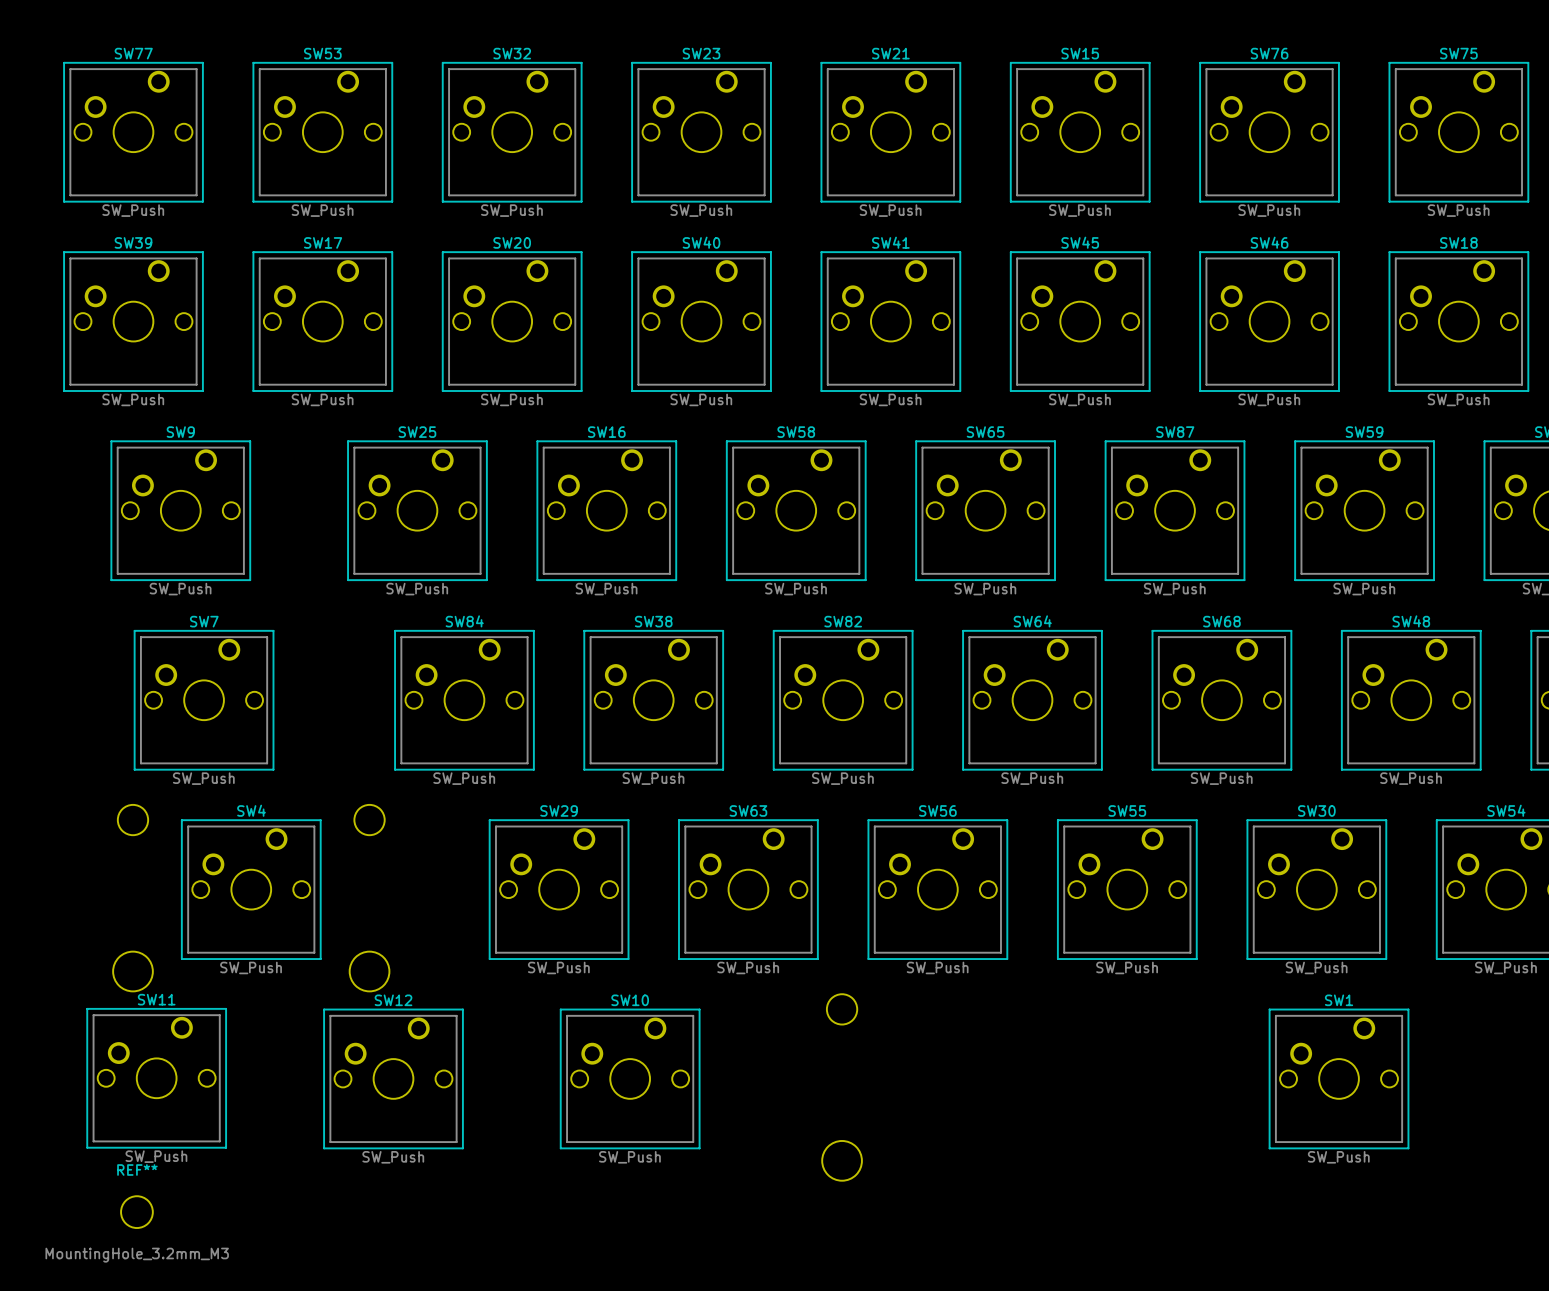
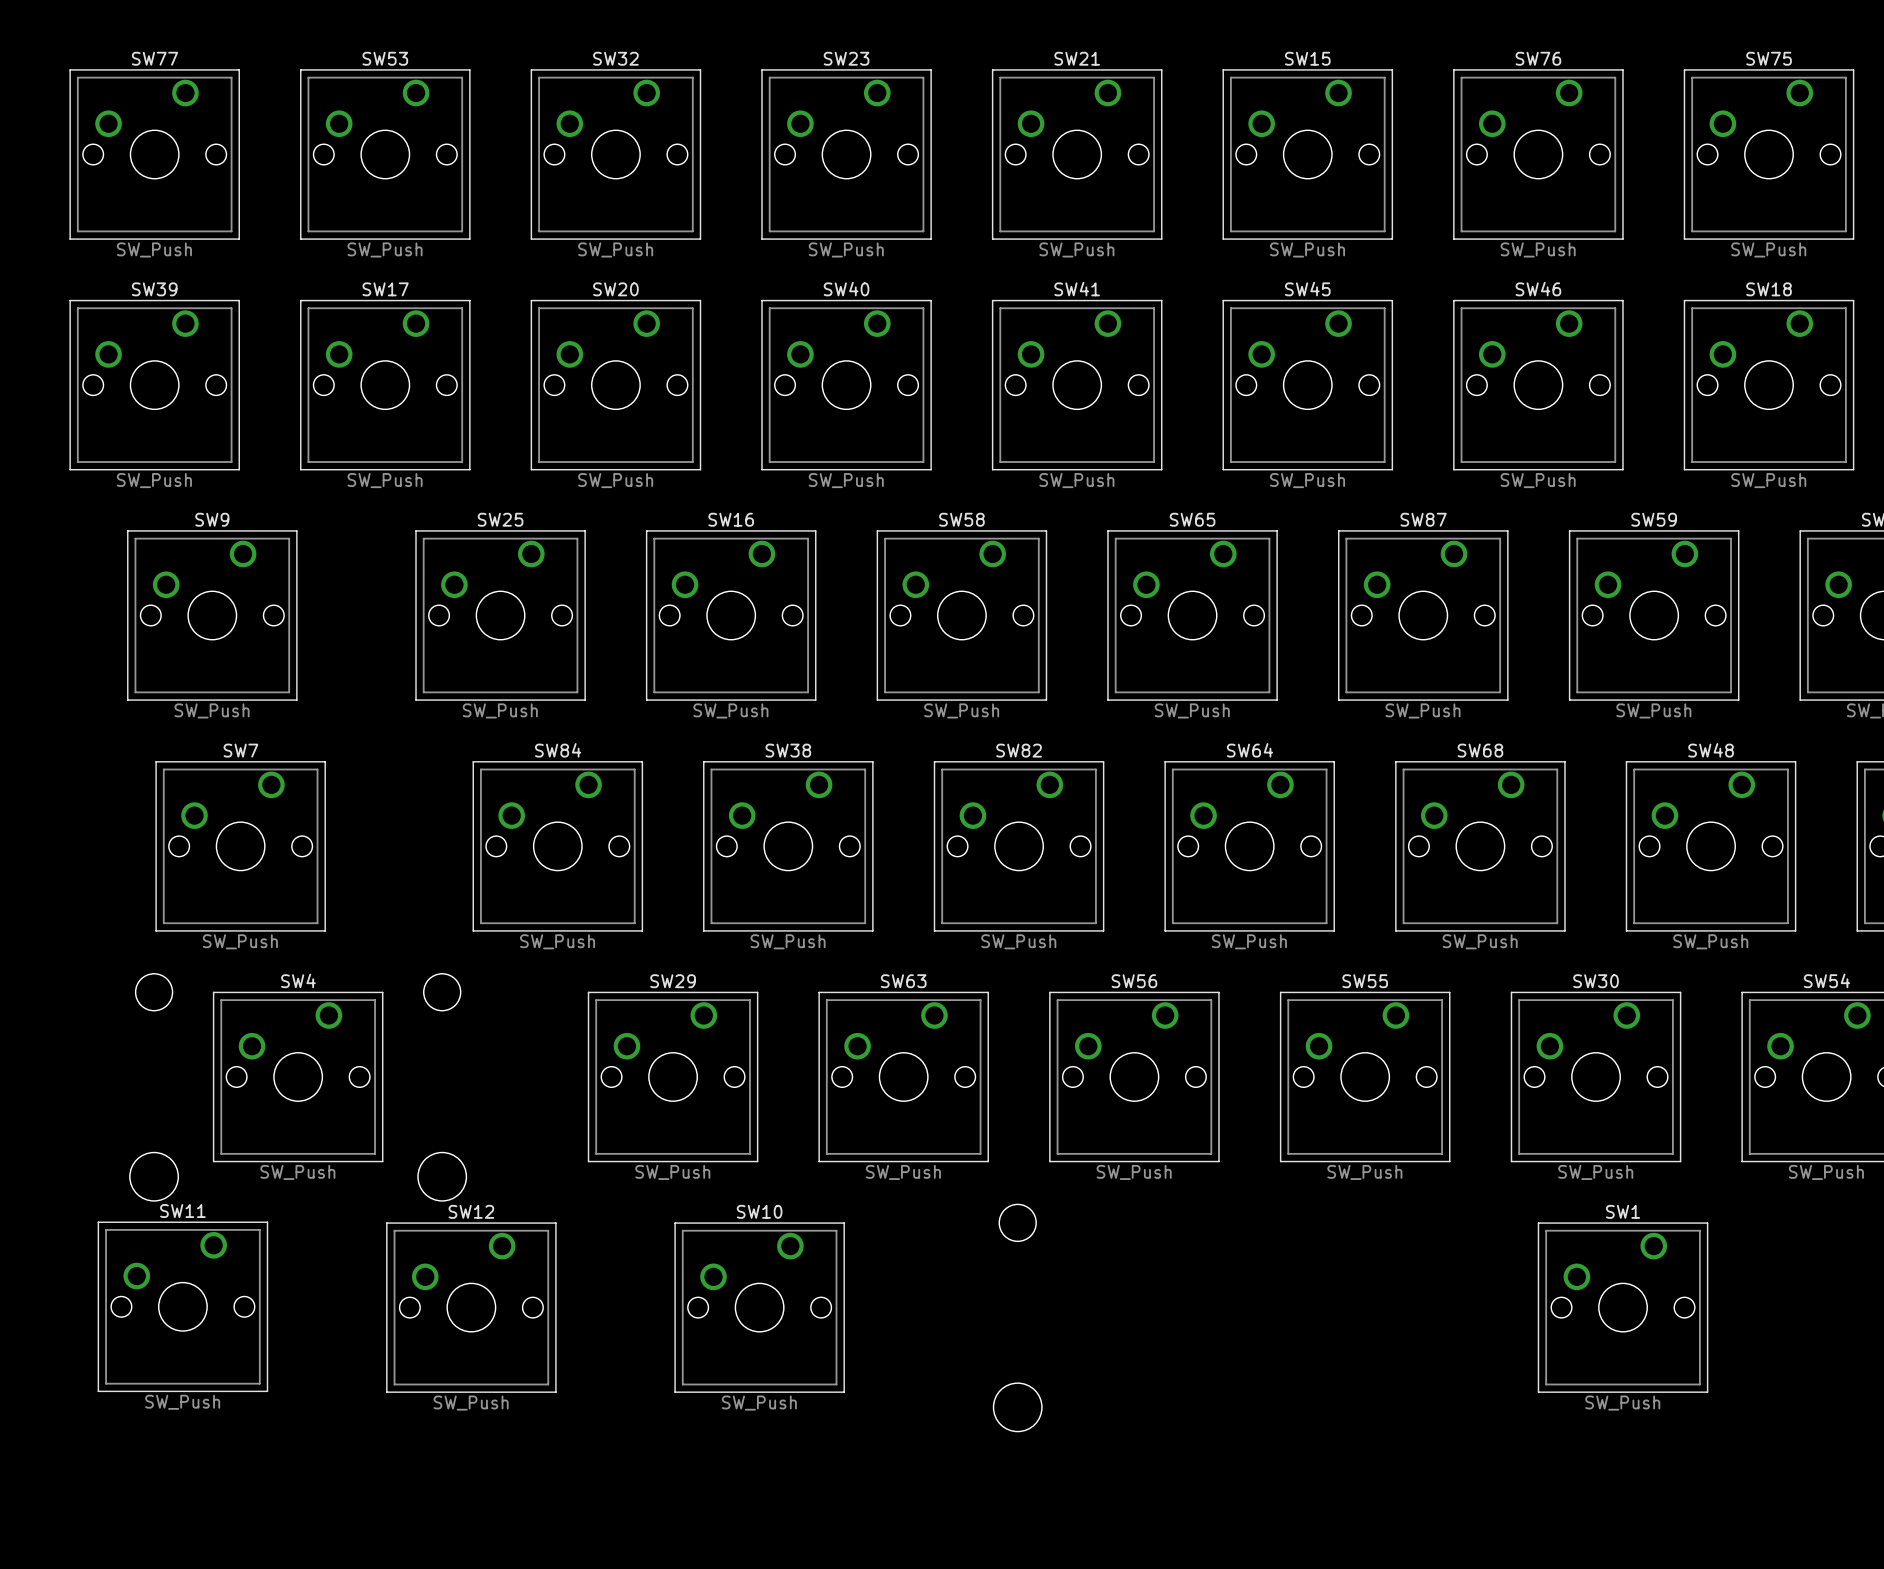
REF**: MountingHole_3.2mm_M3 (136, 1212) -> none

